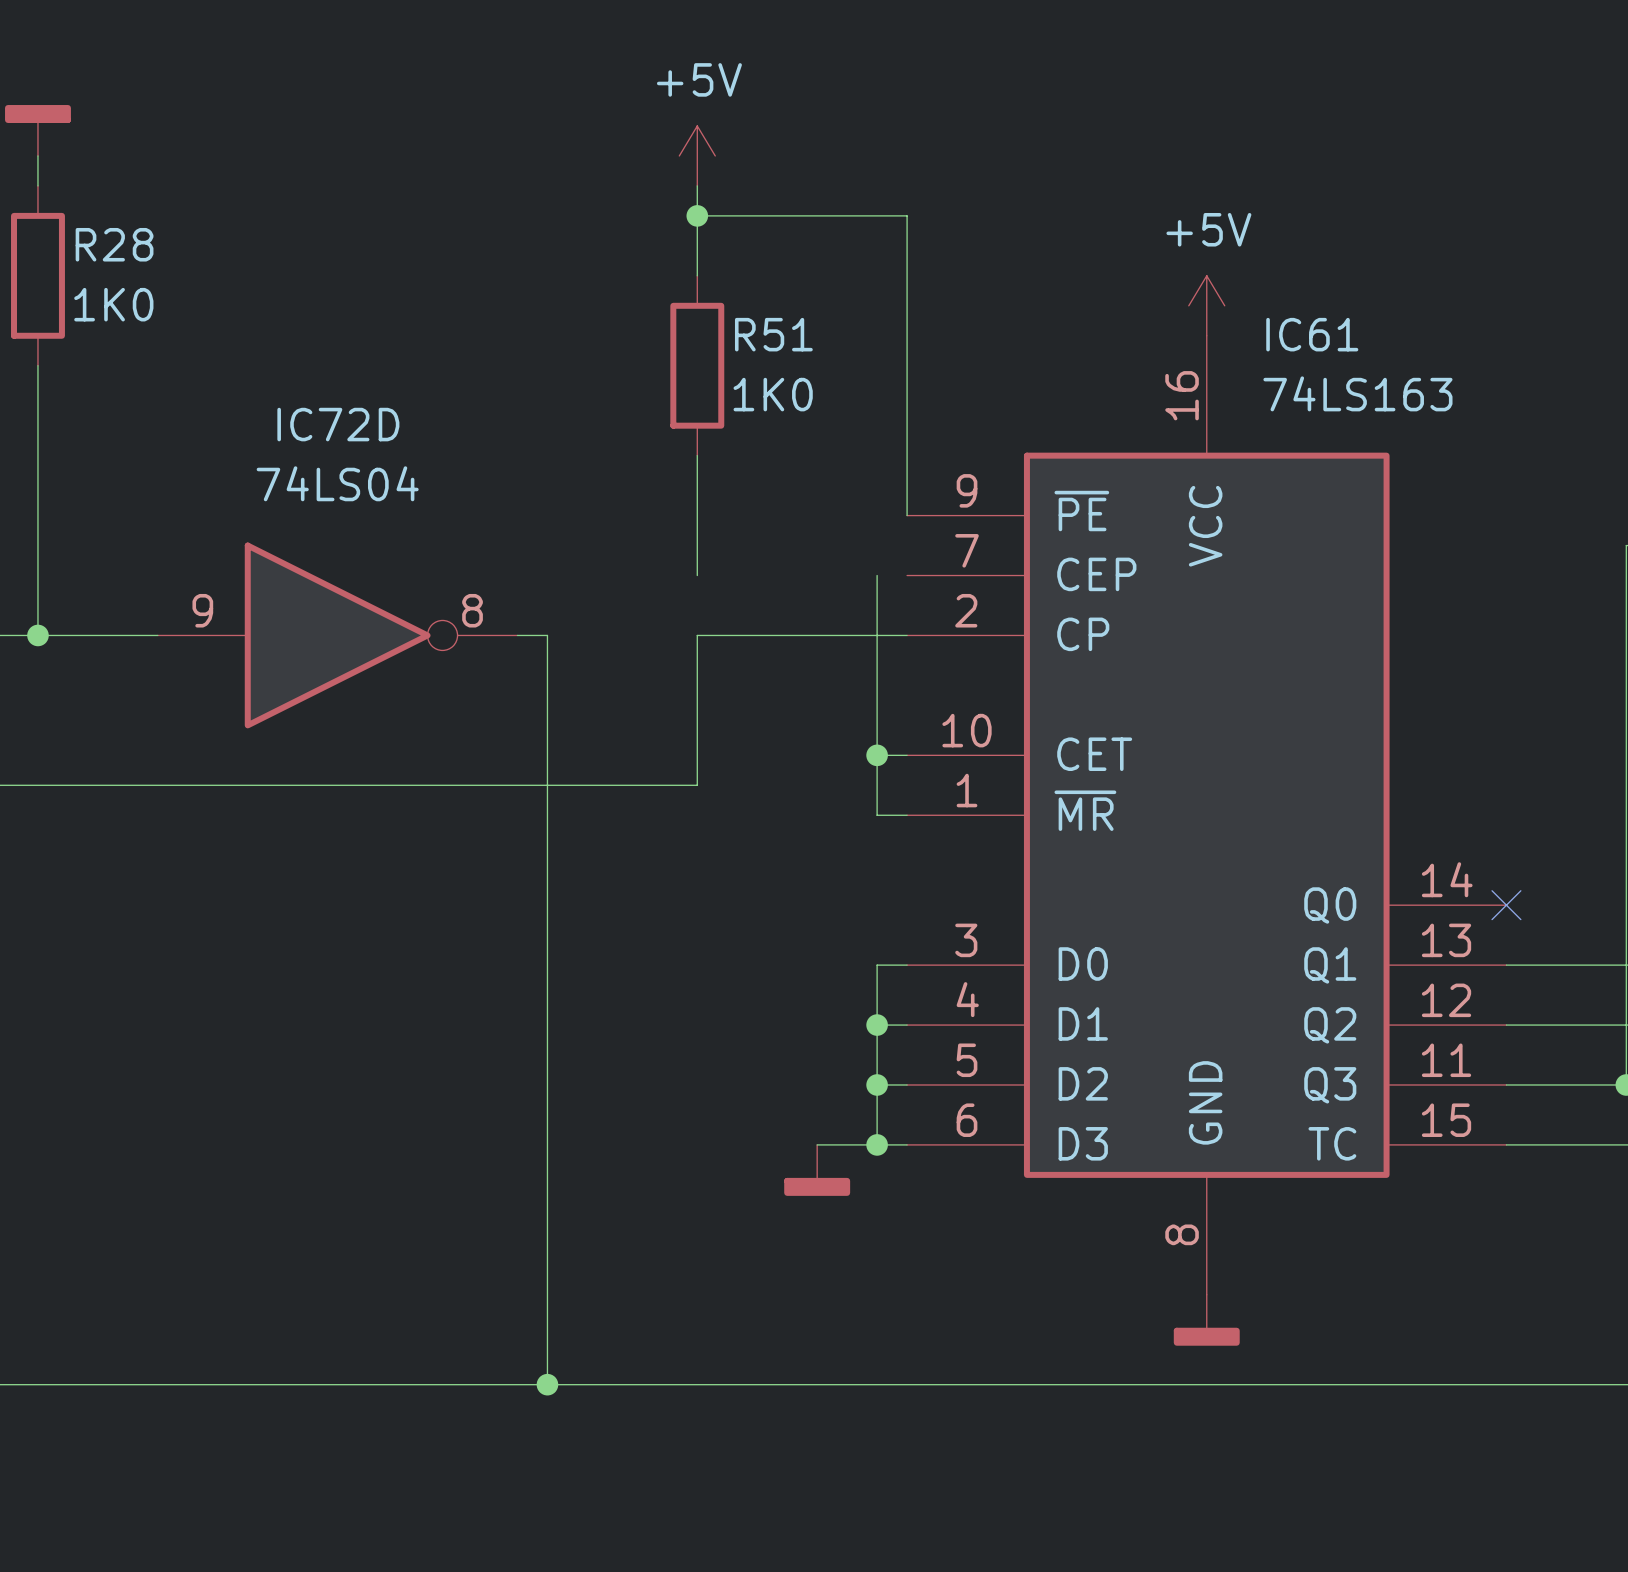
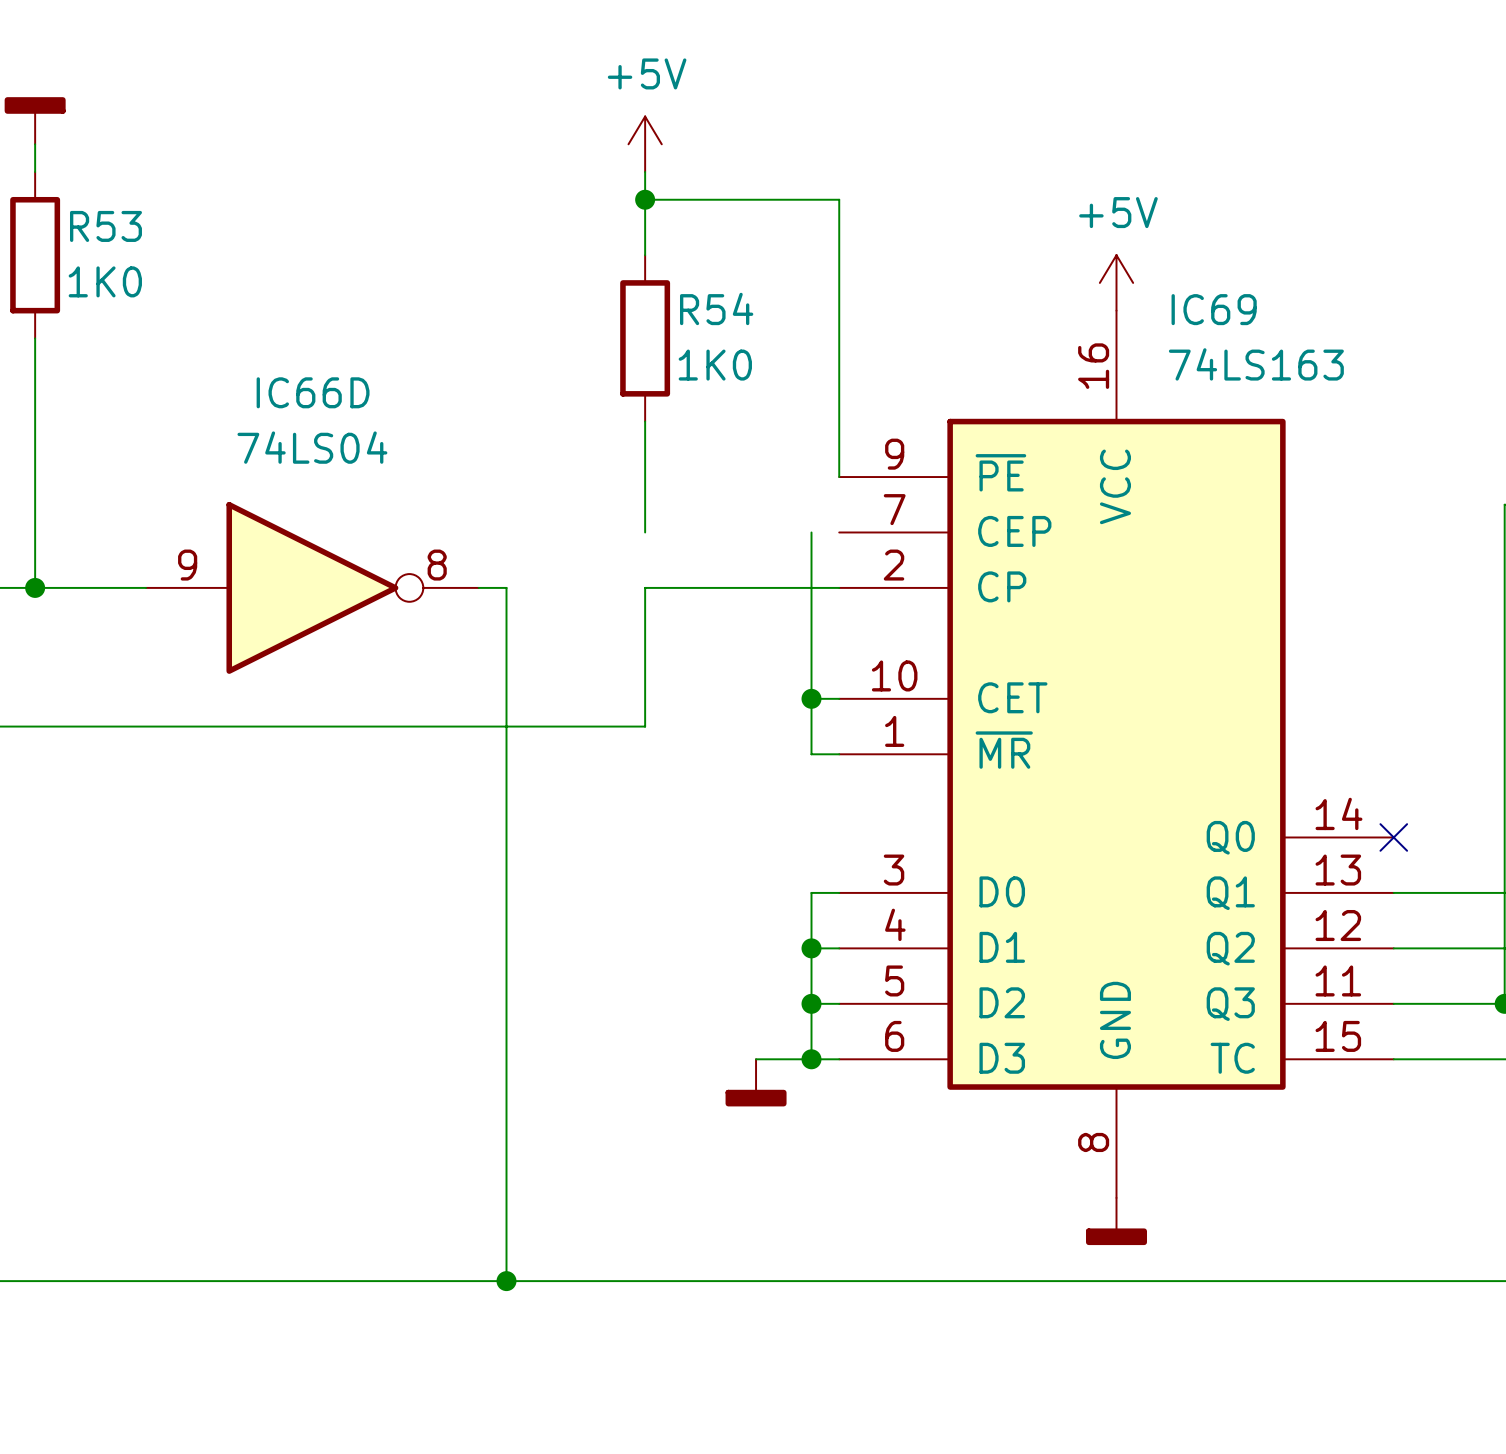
R28 name: R28 (114, 244) -> R53 (105, 226)
R51 name: R51 (773, 334) -> R54 (716, 308)
IC61 name: IC61 (1312, 334) -> IC69 (1214, 309)
IC72D name: IC72D (338, 424) -> IC66D (313, 392)

